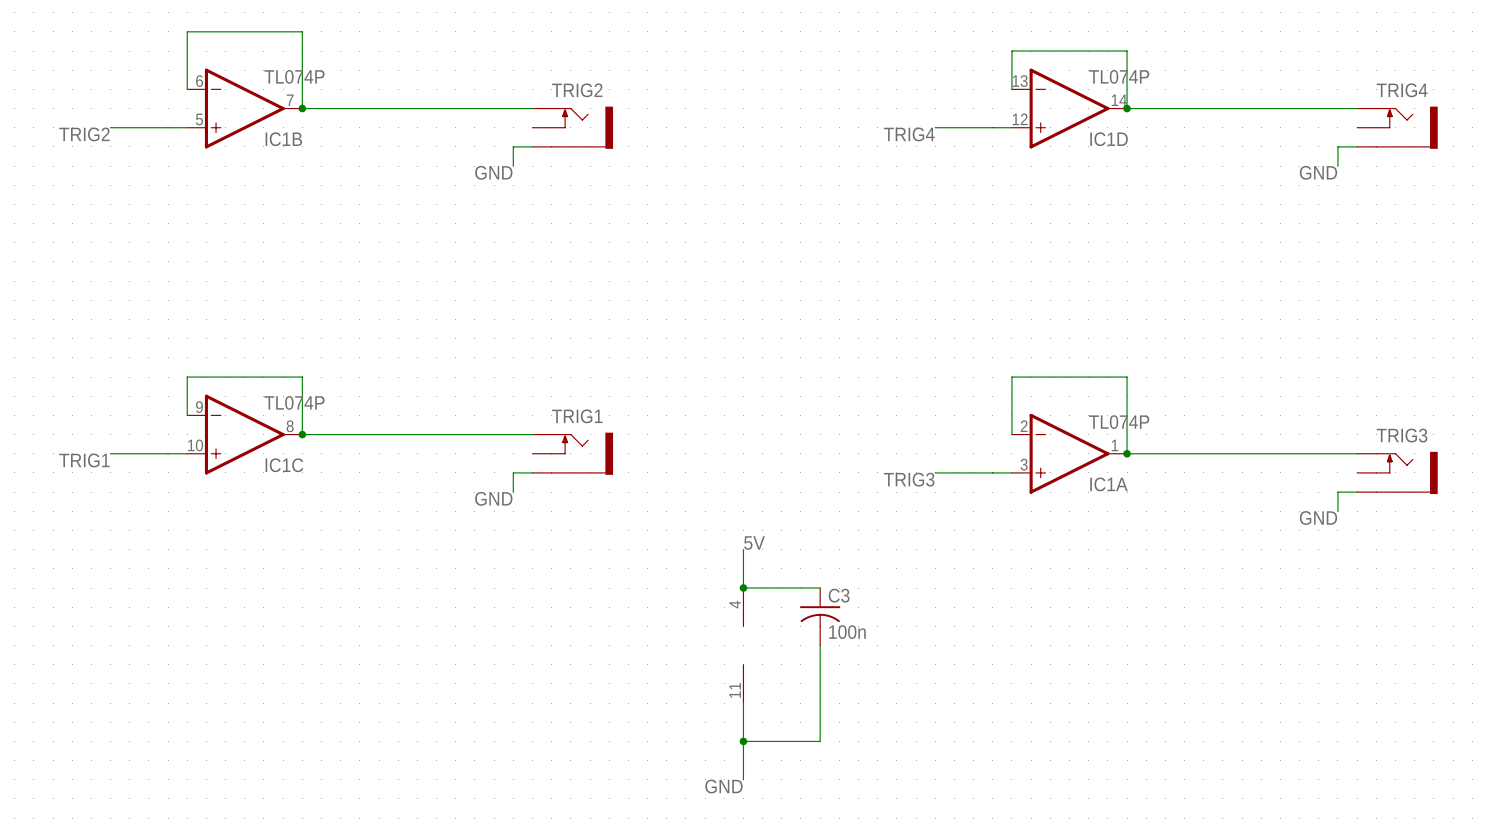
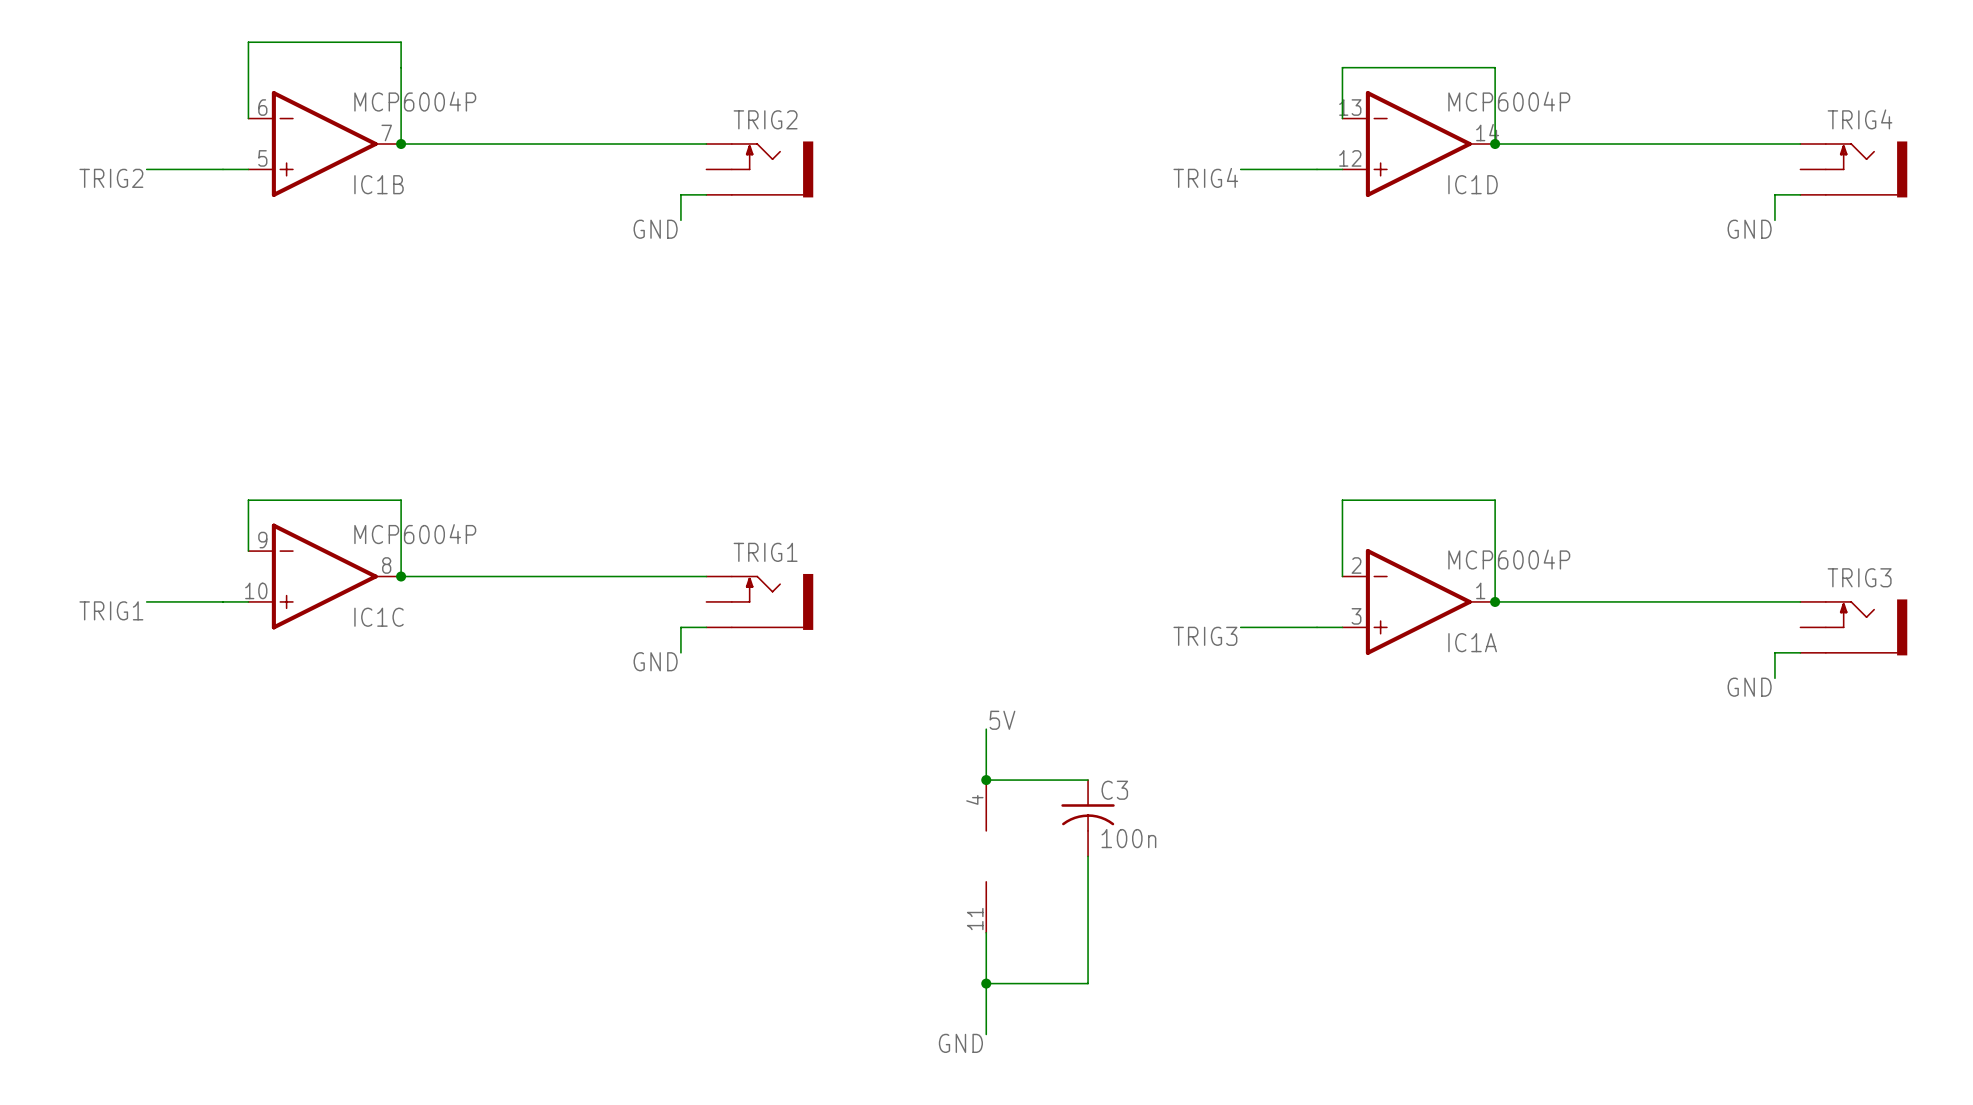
IC1B value: TL074P (294, 76) -> MCP6004P (415, 101)
IC1D value: TL074P (1119, 76) -> MCP6004P (1509, 101)
IC1C value: TL074P (294, 402) -> MCP6004P (415, 534)
IC1A value: TL074P (1119, 422) -> MCP6004P (1509, 559)

